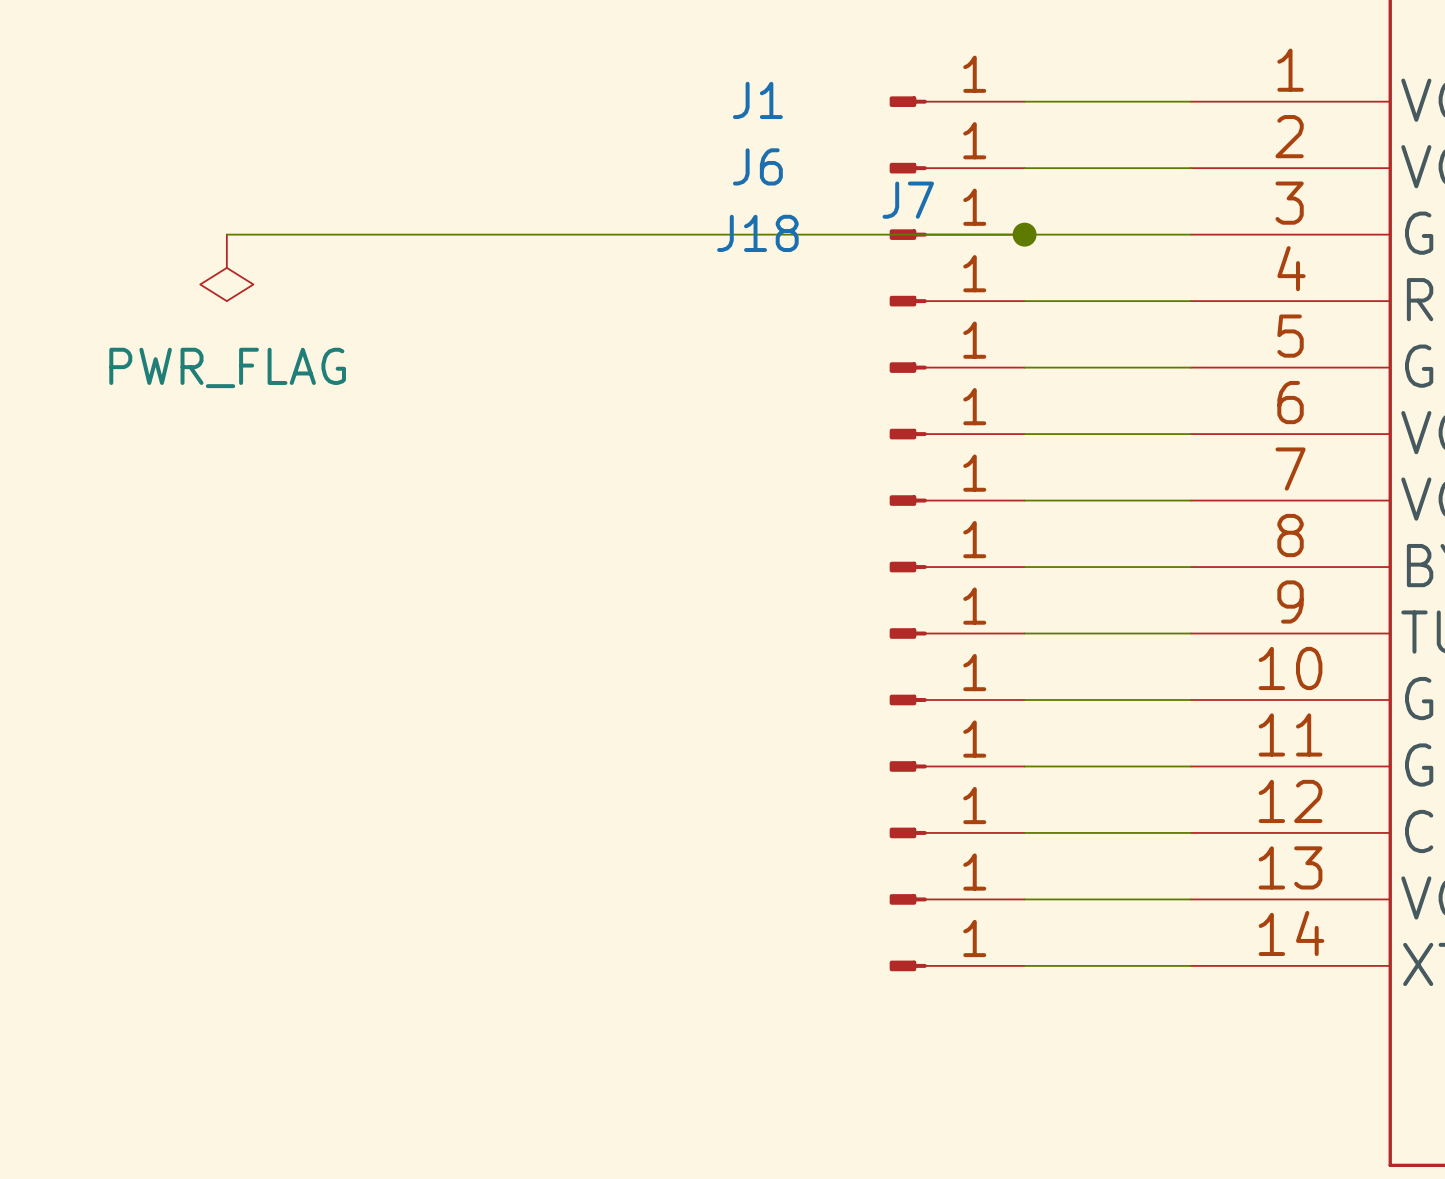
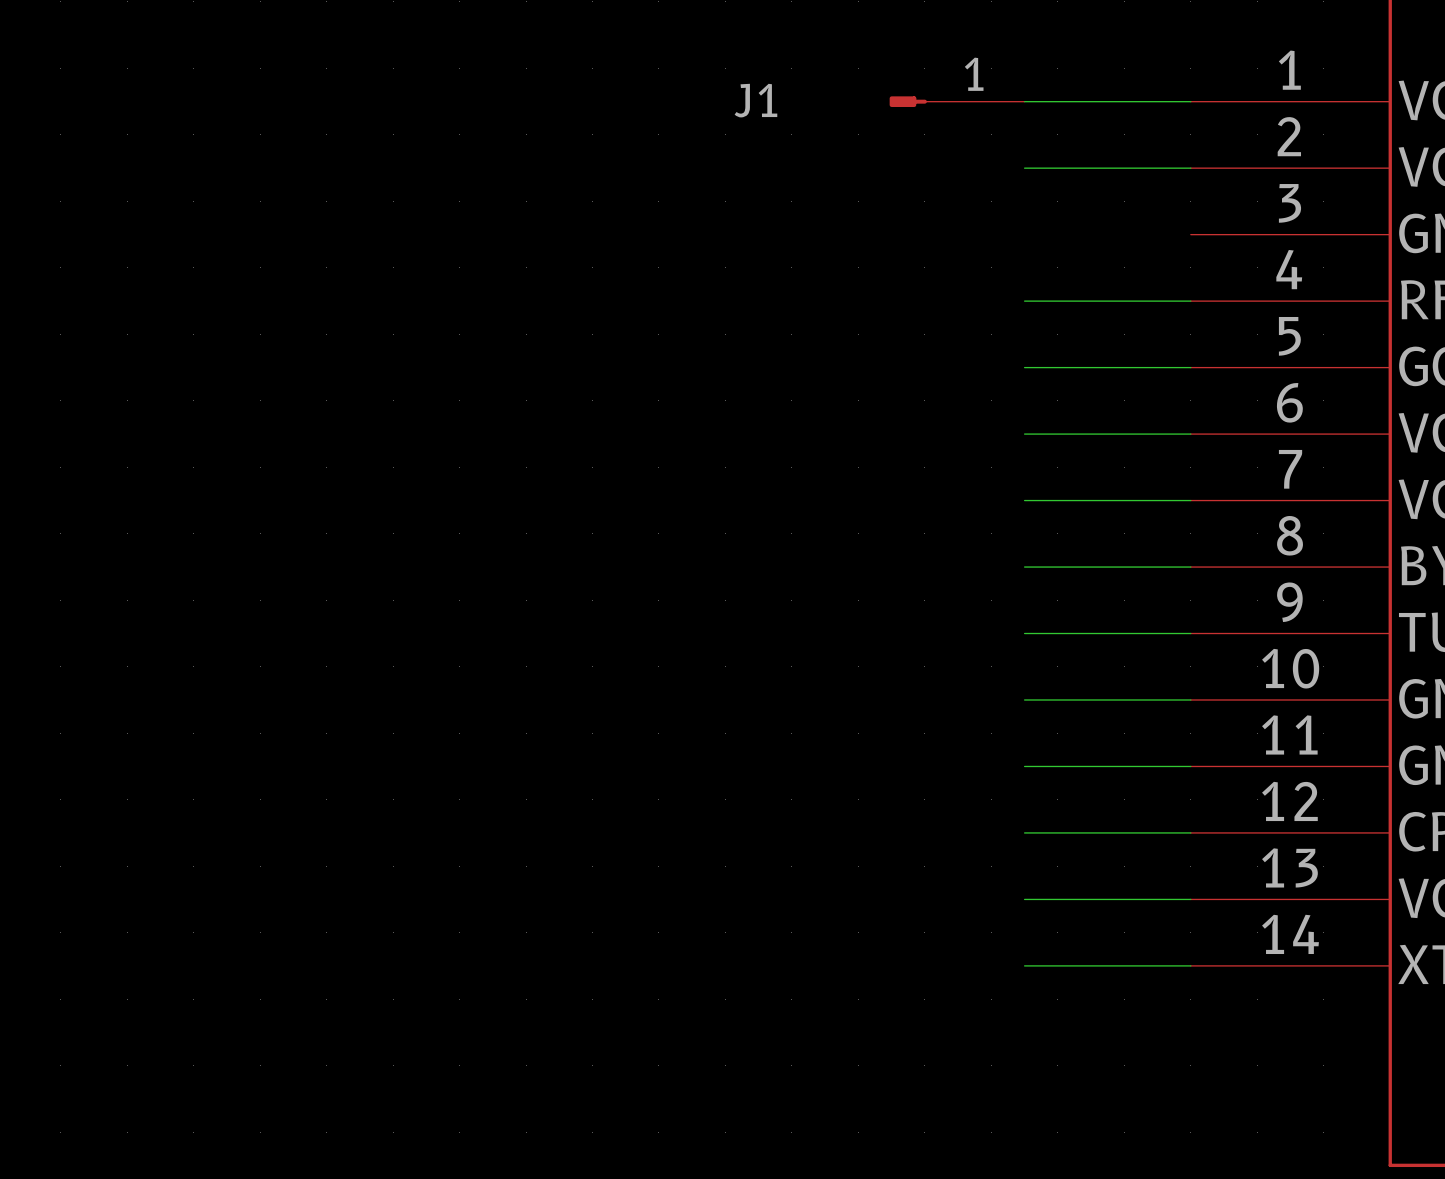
J6: (957, 168) -> none
wire: (226, 234) (1190, 234) -> none
J18: (957, 234) -> none
junction: (1024, 234) -> none
power symbol: PWR_FLAG (226, 267) -> none
J7: (957, 301) -> none
part: (957, 367) -> none
part: (957, 434) -> none
part: (957, 500) -> none
part: (957, 567) -> none
part: (957, 633) -> none
part: (957, 699) -> none
part: (957, 766) -> none
part: (957, 832) -> none
part: (957, 899) -> none
part: (957, 965) -> none

